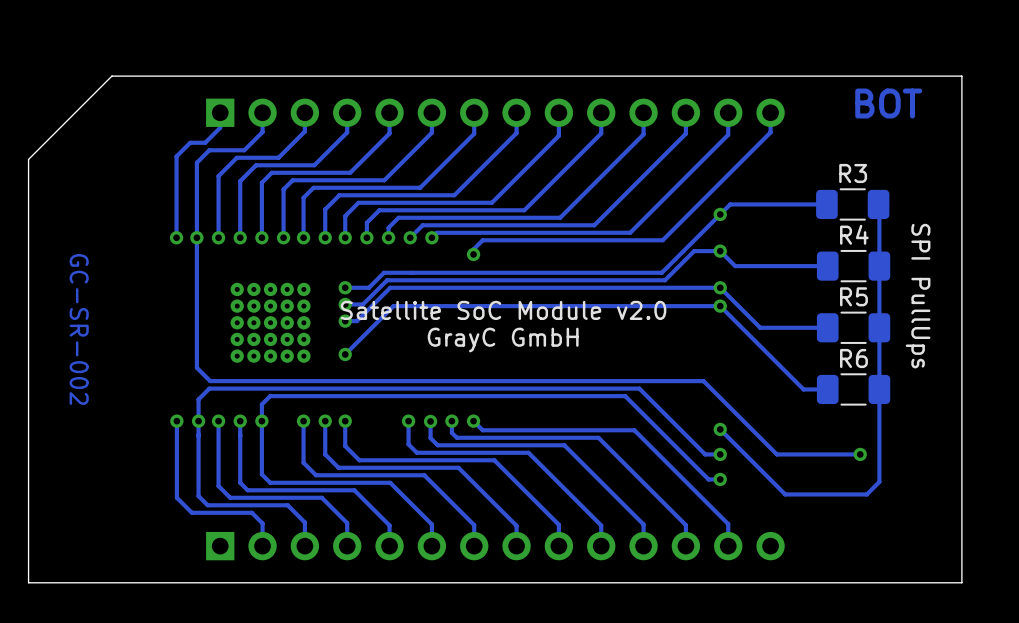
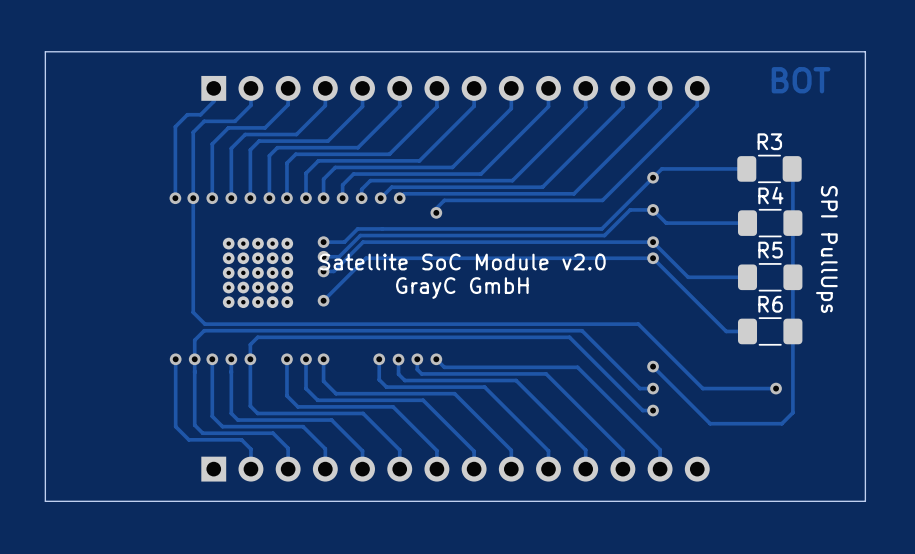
board edge: (961, 76) (111, 76) (28, 159) -> (865, 56) (865, 51) (45, 51) (45, 129)
text: GC-SR-002 (79, 329) -> none

